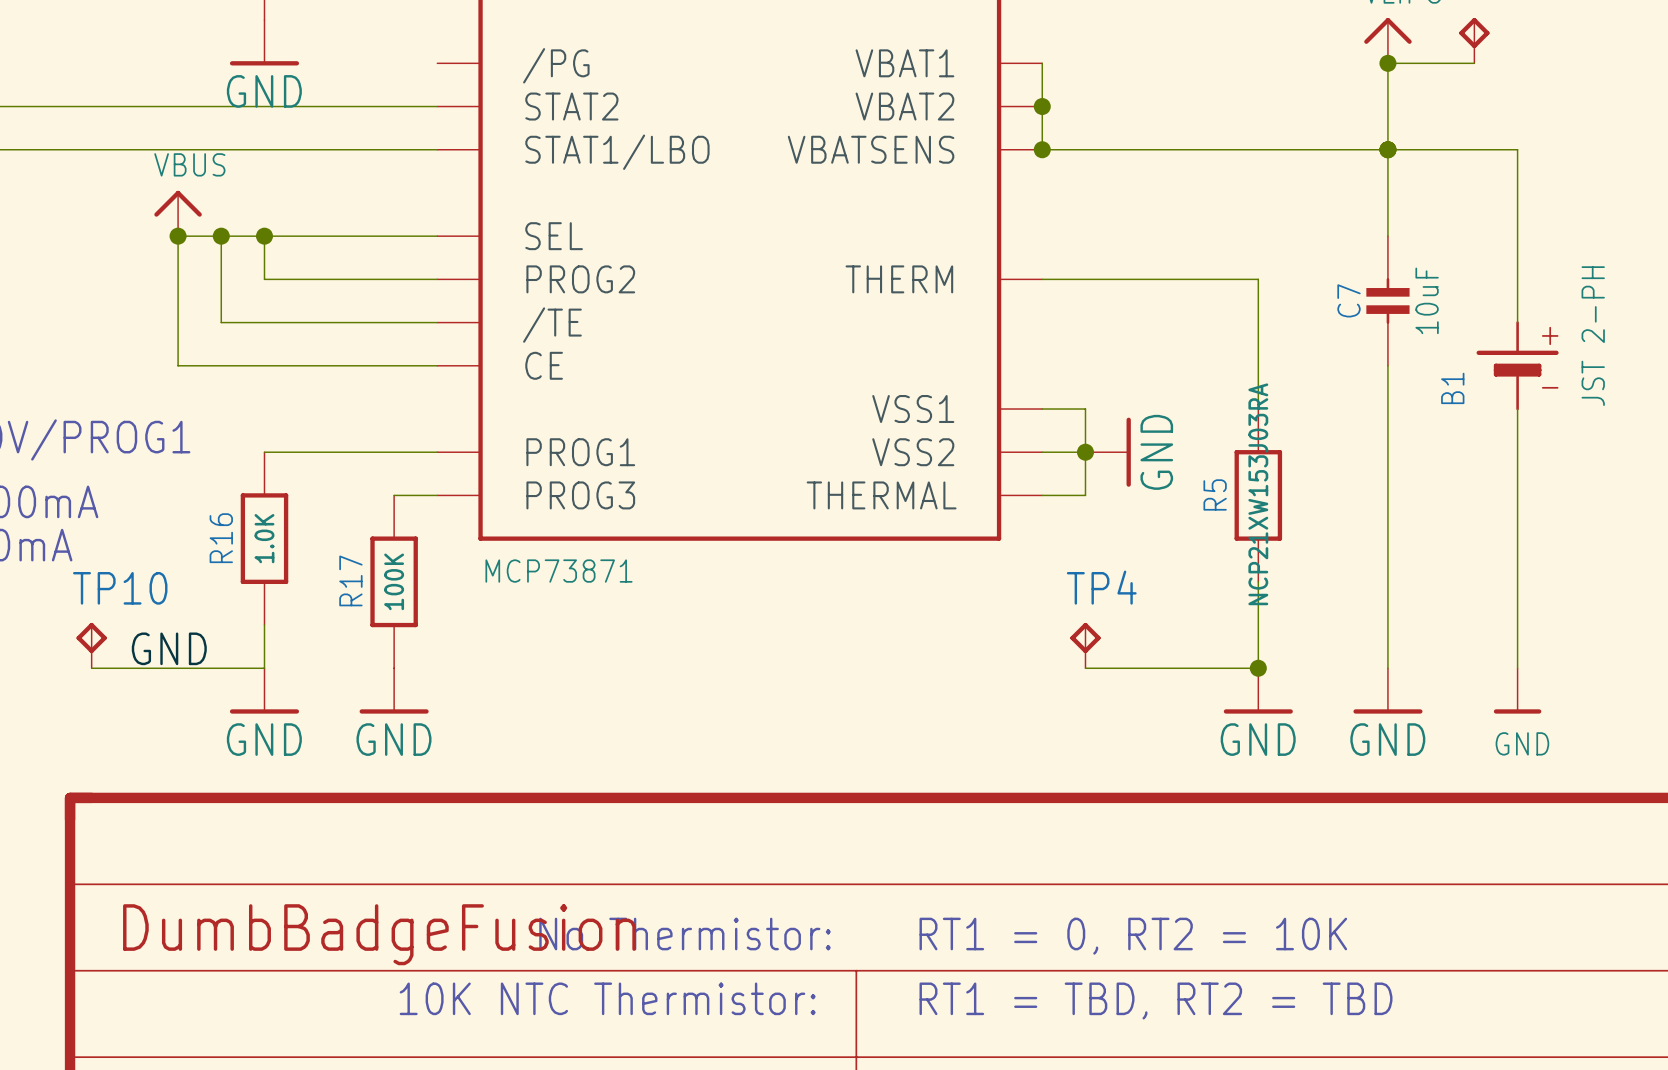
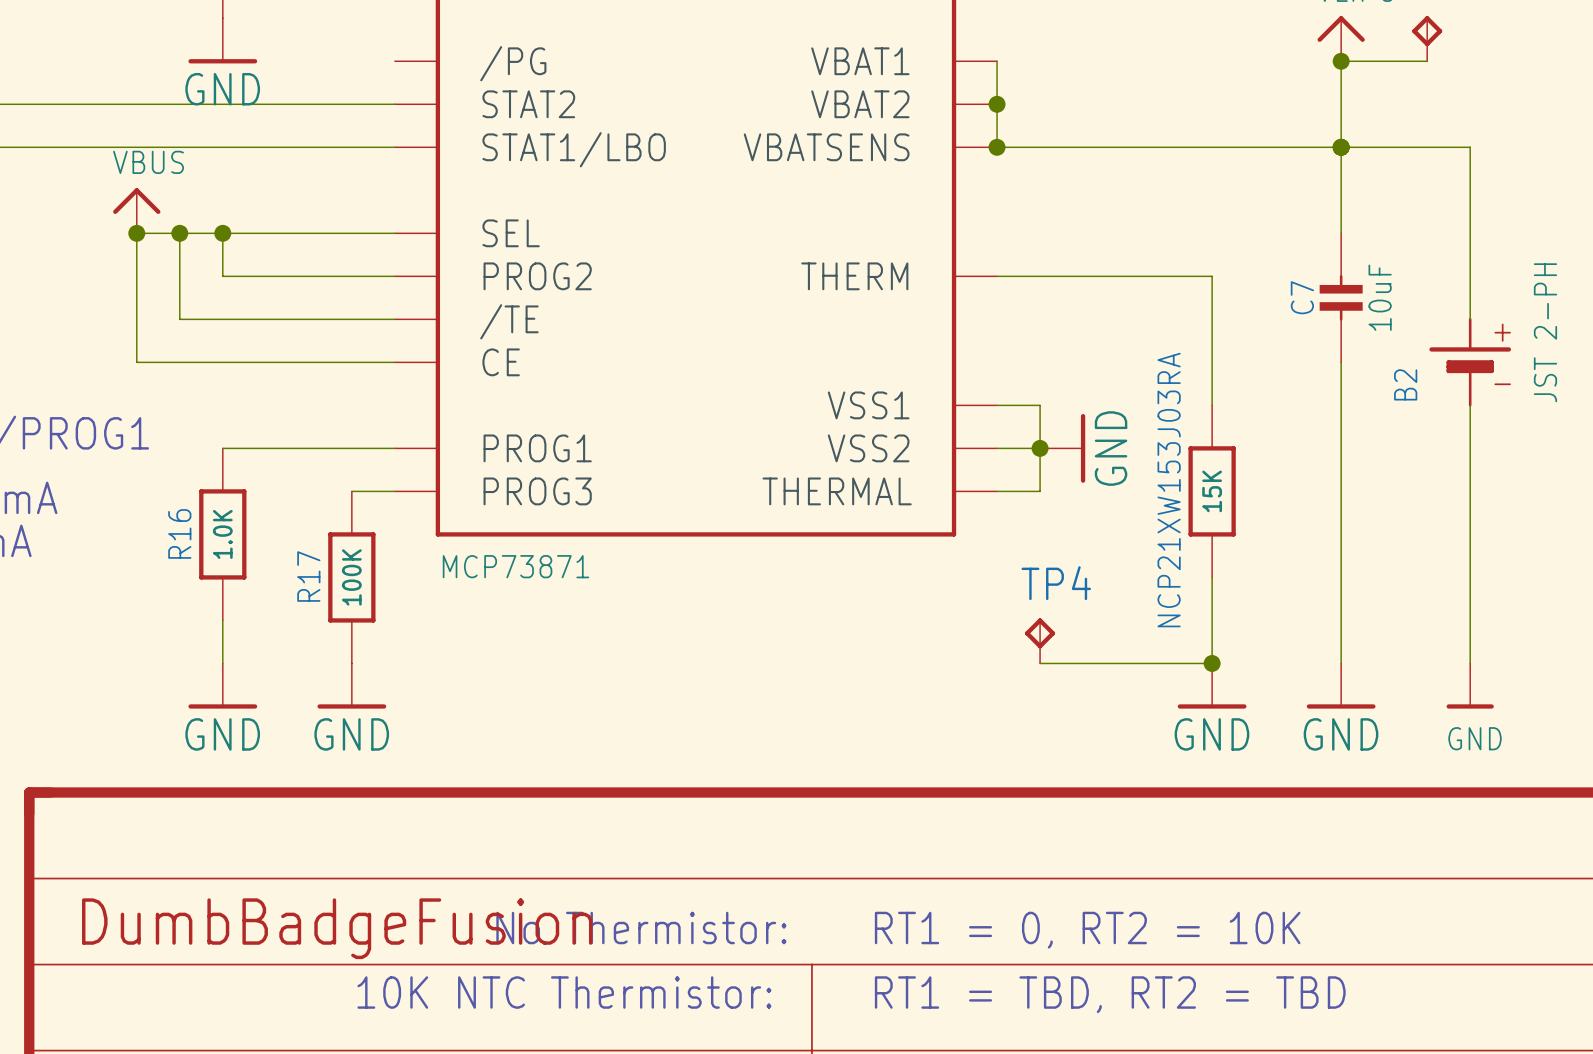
B1 name: B1 (1452, 388) -> B2 (1405, 384)
R5 name: R5 (1215, 494) -> NCP21XW153J03RA (1169, 490)
R5 value: NCP21XW153J03RA (1258, 494) -> 15K (1212, 491)
TP10: (91, 645) -> none
label: GND (169, 648) -> none
wire: (91, 668) (264, 668) -> none

